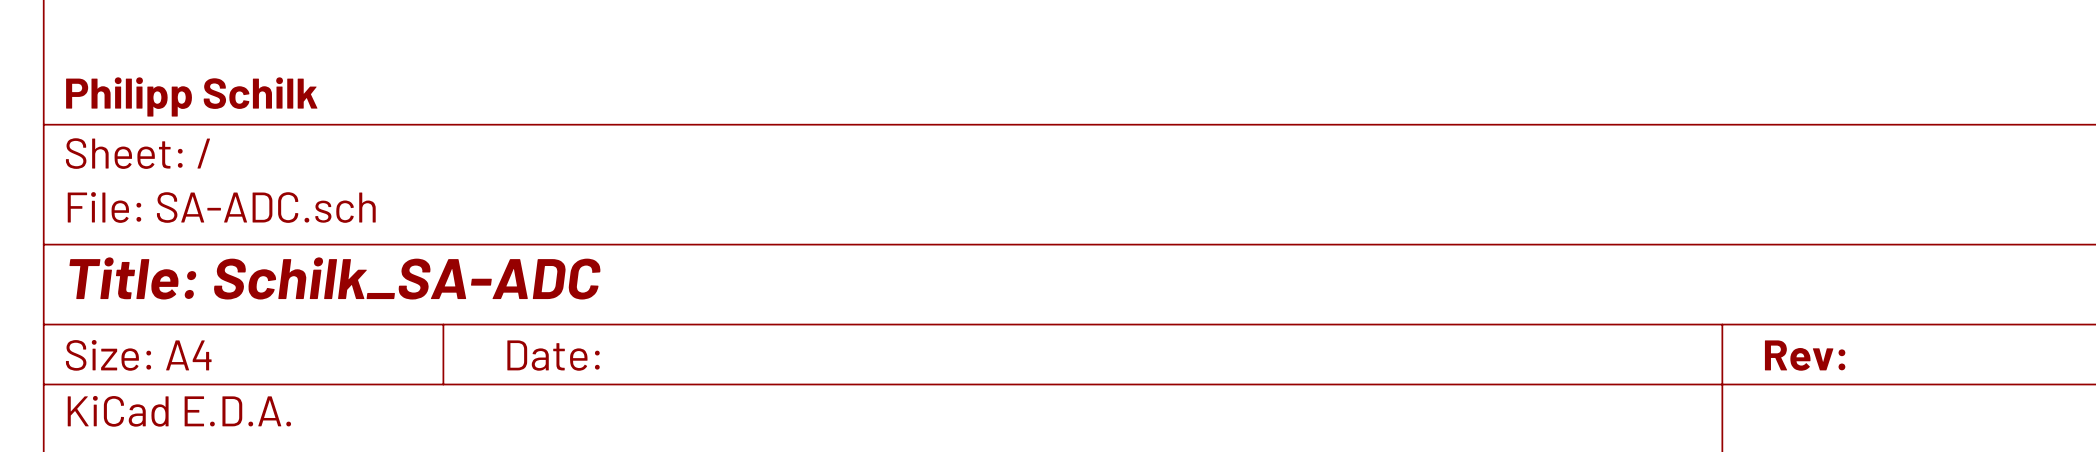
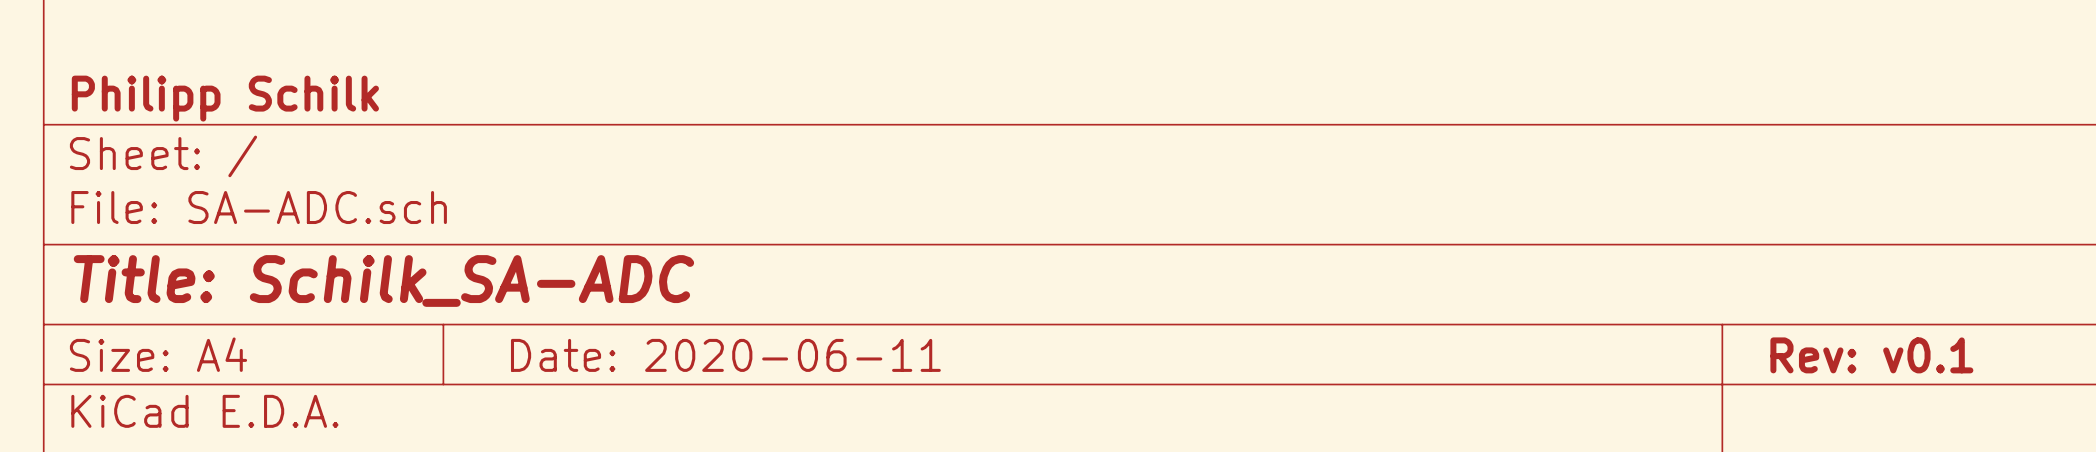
title block: Date: (553, 355) -> Date: 2020-06-11 (725, 355)
title block: Rev: (1805, 355) -> Rev: v0.1 (1871, 355)

